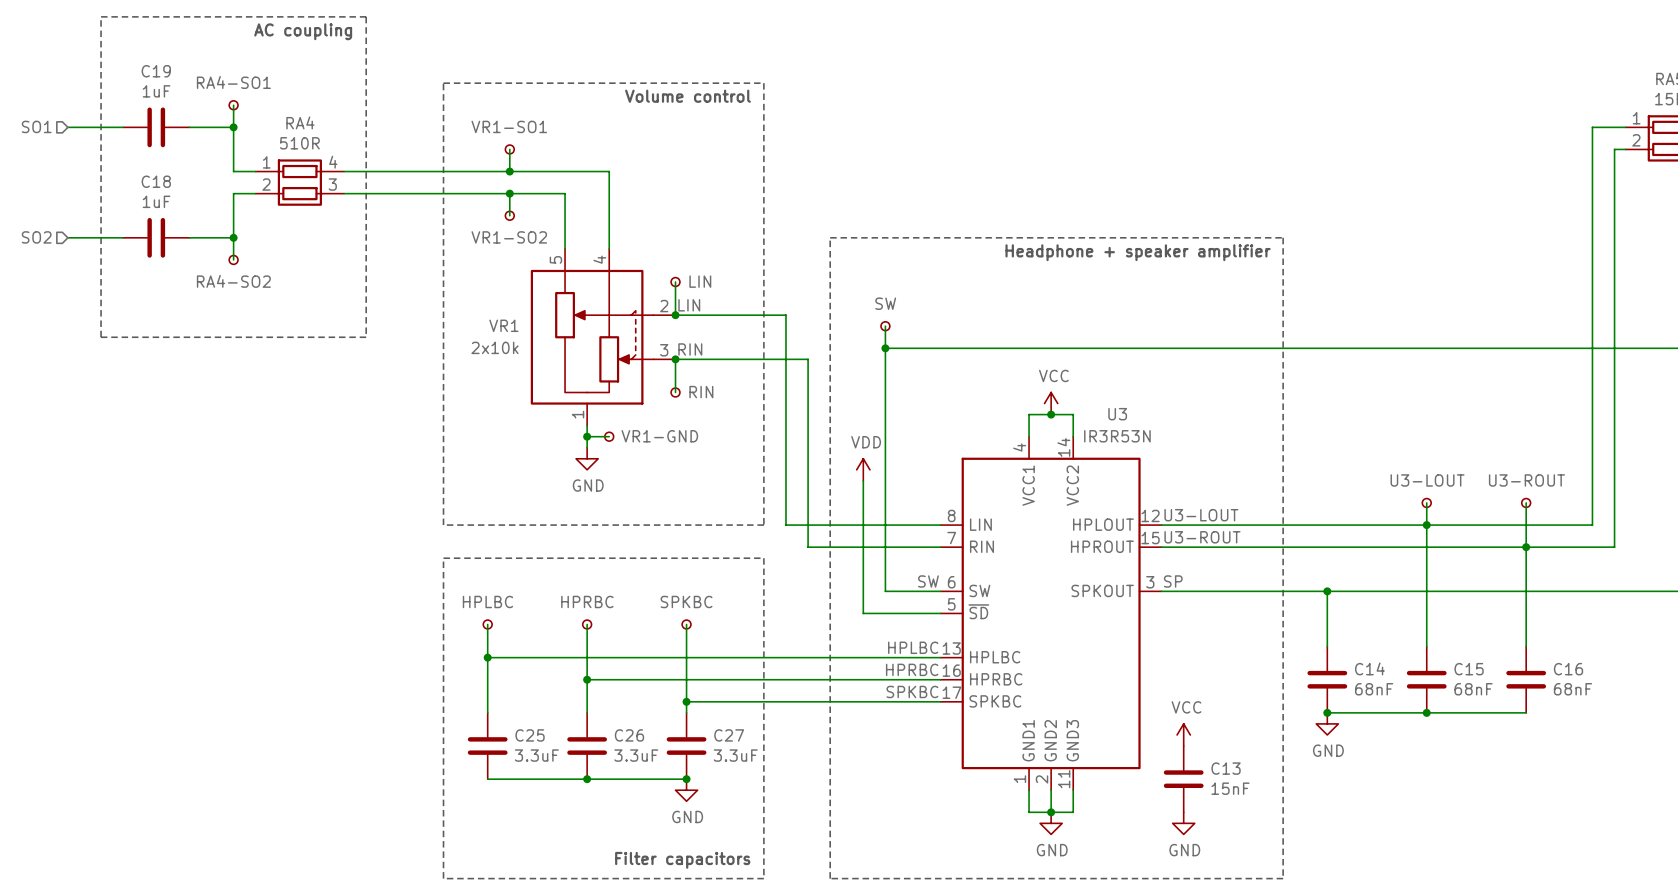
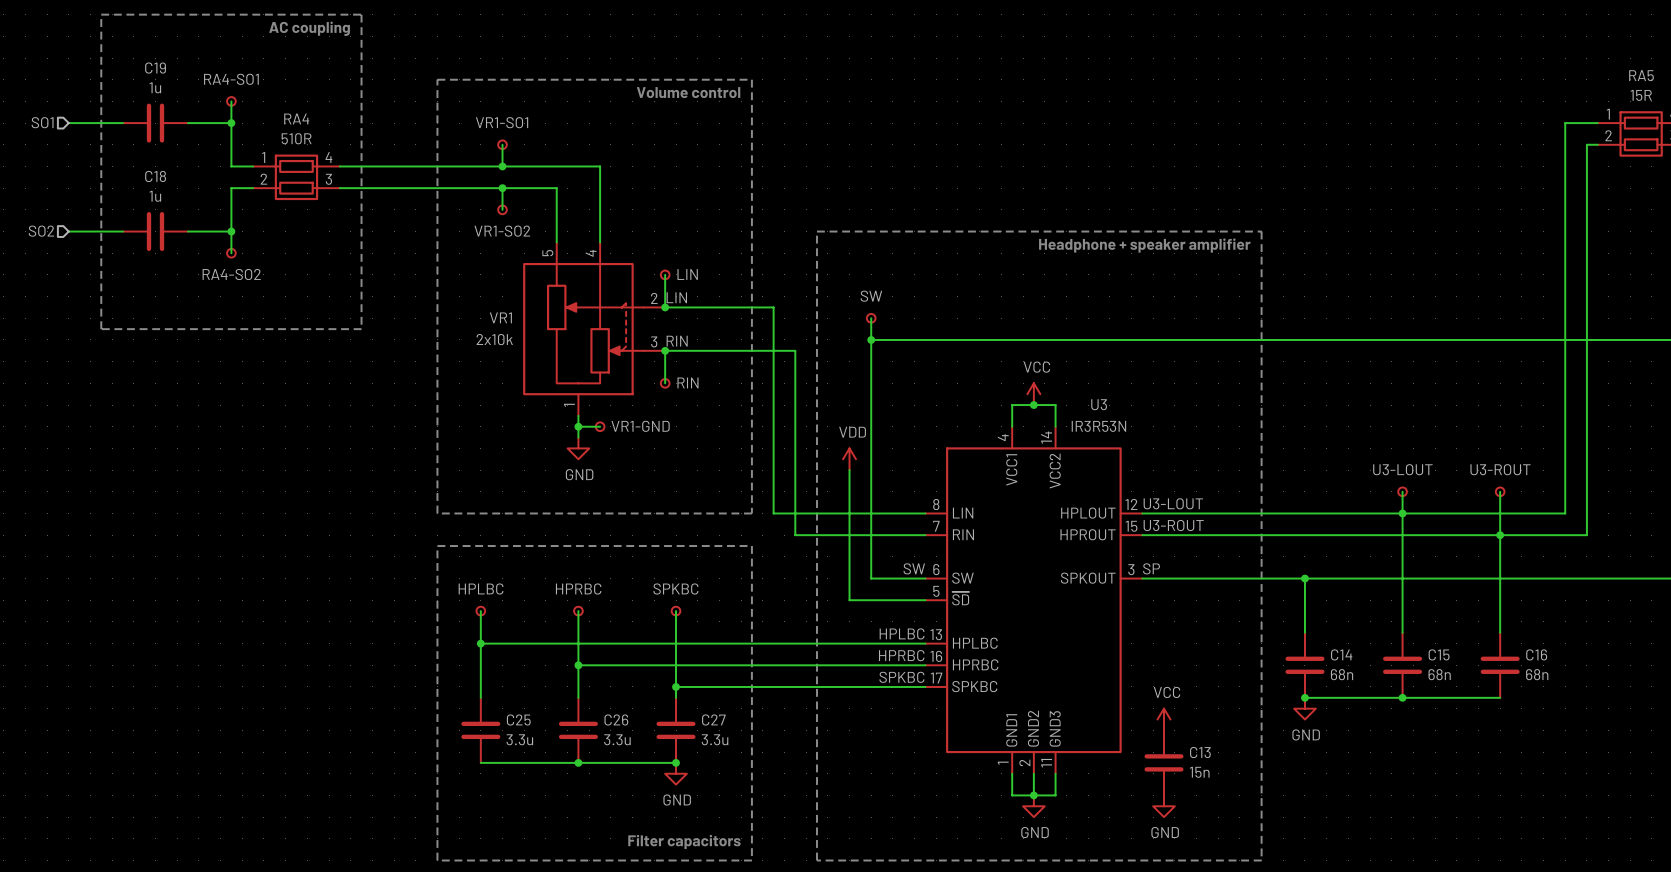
C19 value: 1uF (156, 91) -> 1u (155, 87)
C18 value: 1uF (156, 201) -> 1u (155, 196)
C14 value: 68nF (1374, 689) -> 68n (1342, 674)
C15 value: 68nF (1473, 689) -> 68n (1439, 674)
C16 value: 68nF (1572, 689) -> 68n (1537, 674)
C25 value: 3.3uF (536, 755) -> 3.3u (519, 739)
C26 value: 3.3uF (636, 755) -> 3.3u (617, 739)
C27 value: 3.3uF (735, 755) -> 3.3u (715, 739)
C13 value: 15nF (1230, 788) -> 15n (1199, 772)

